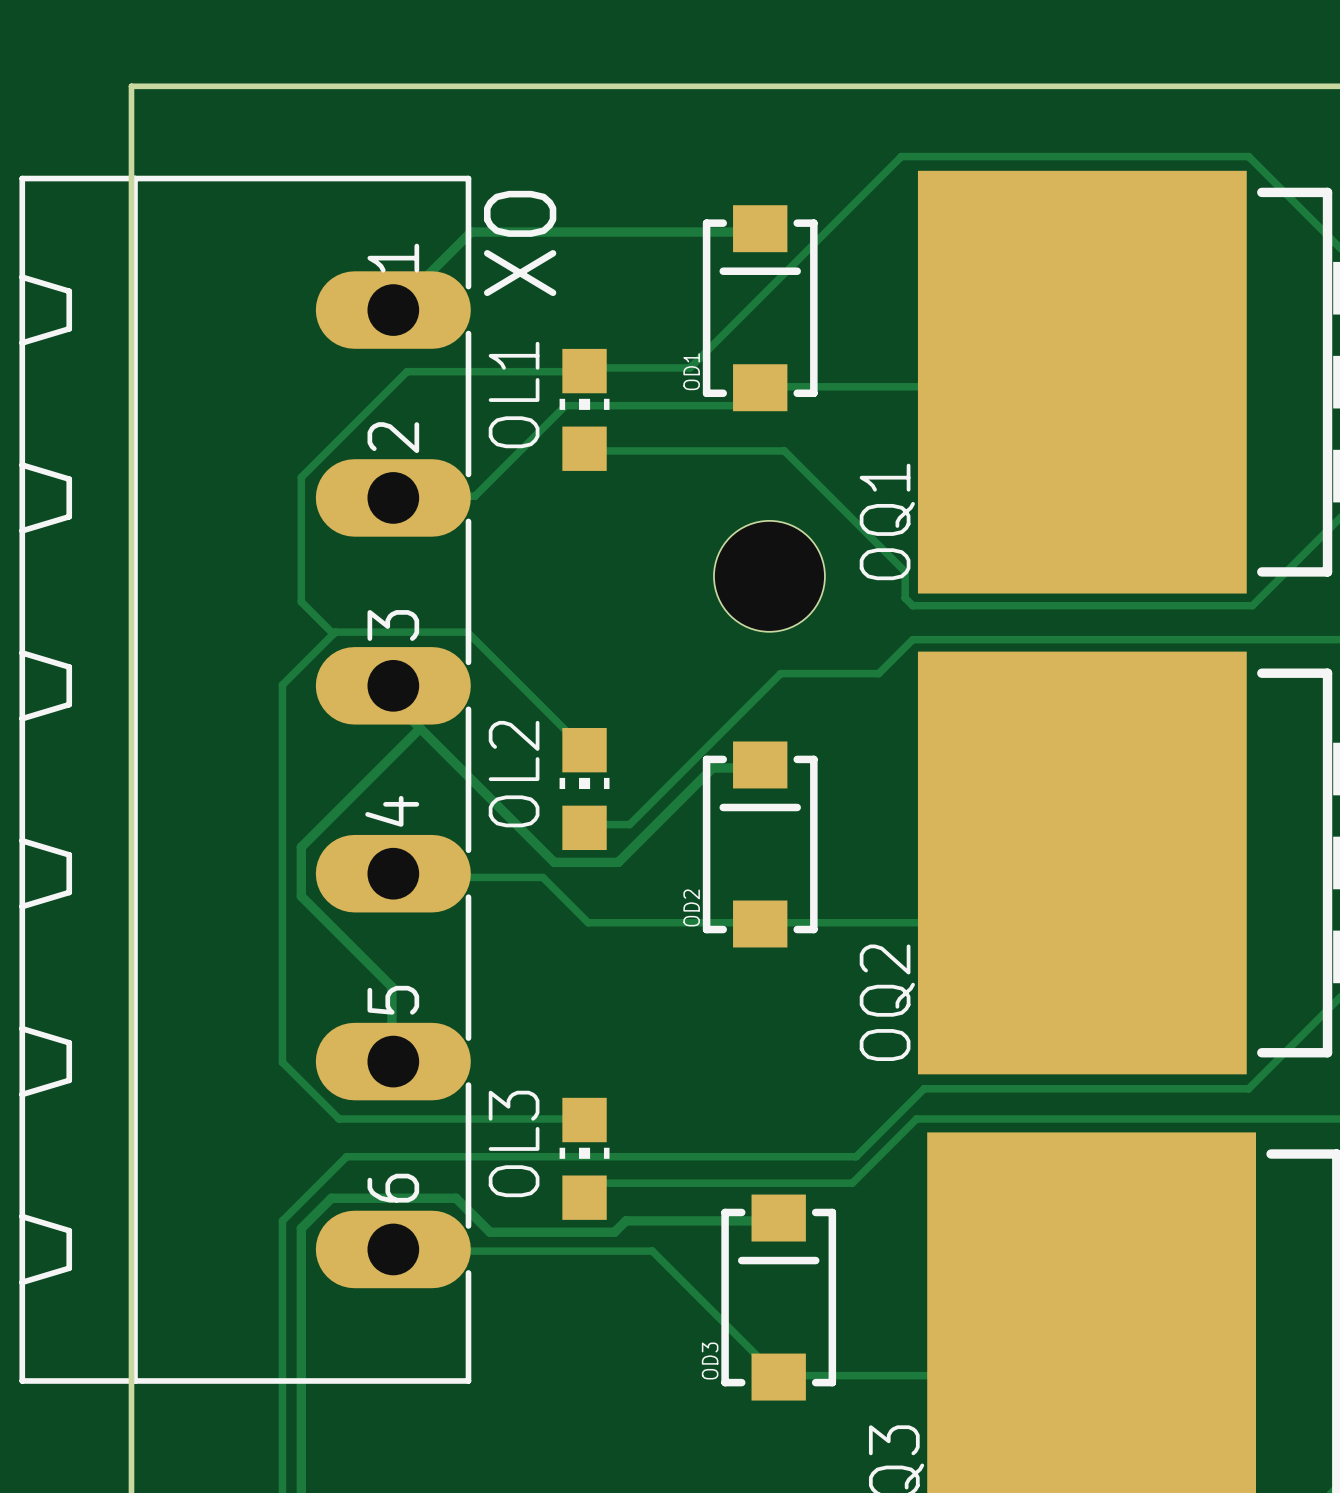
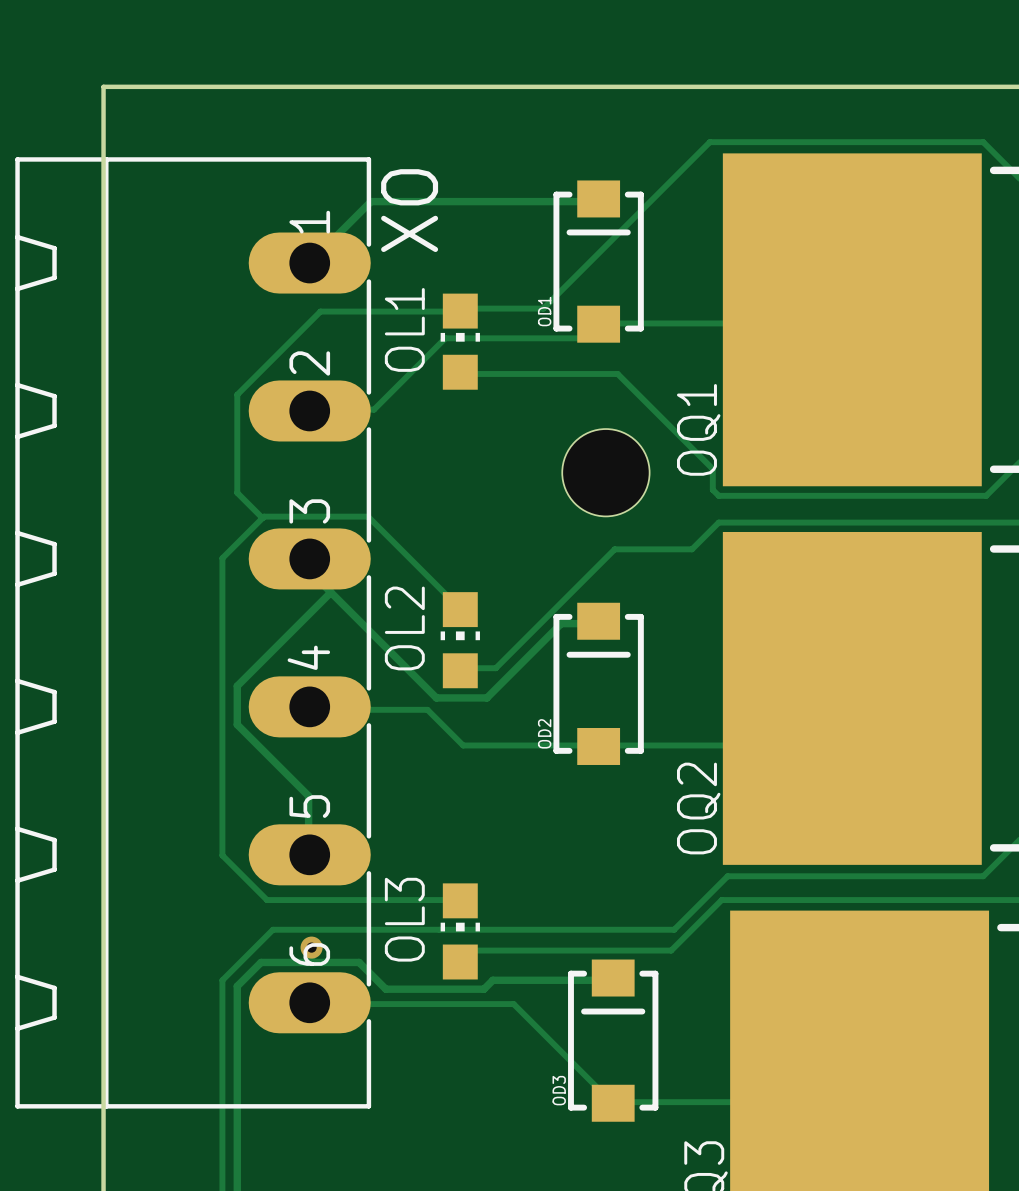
via: none -> (311, 947)

